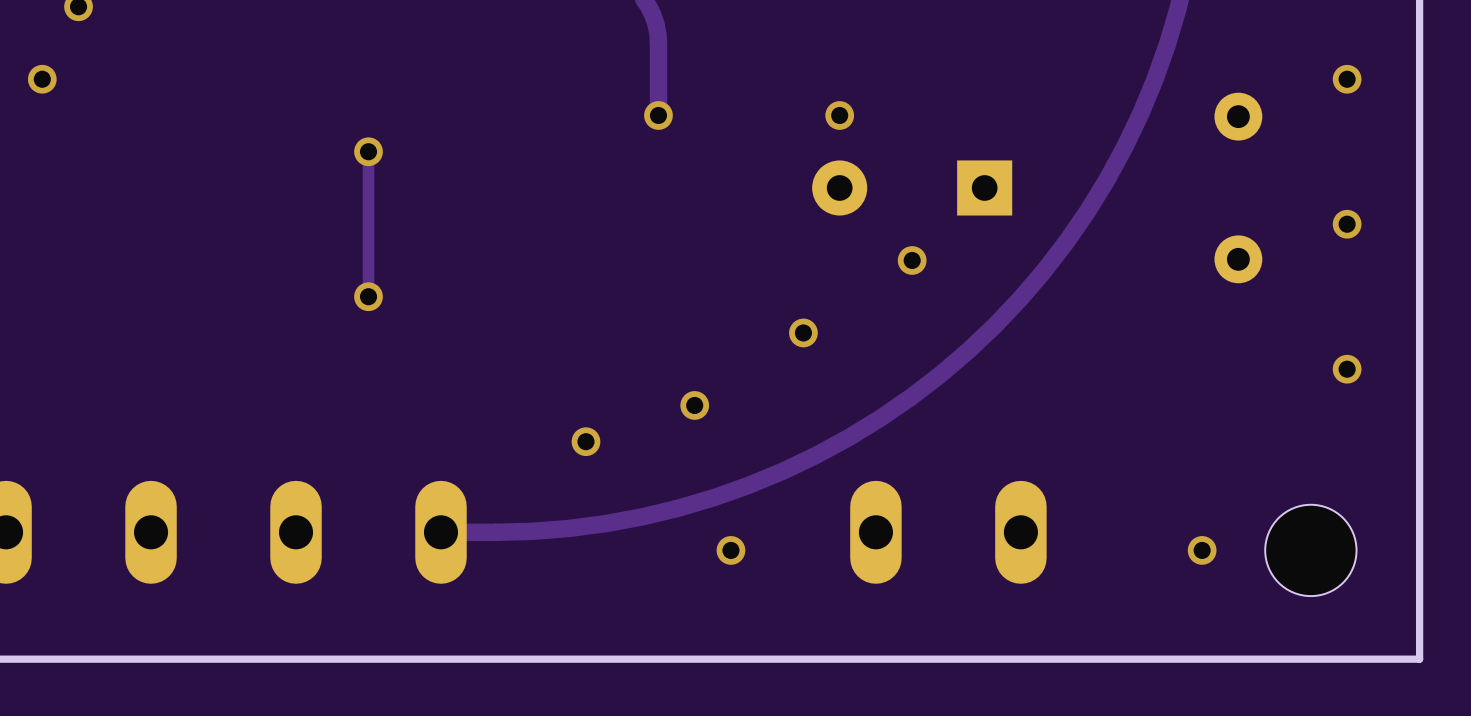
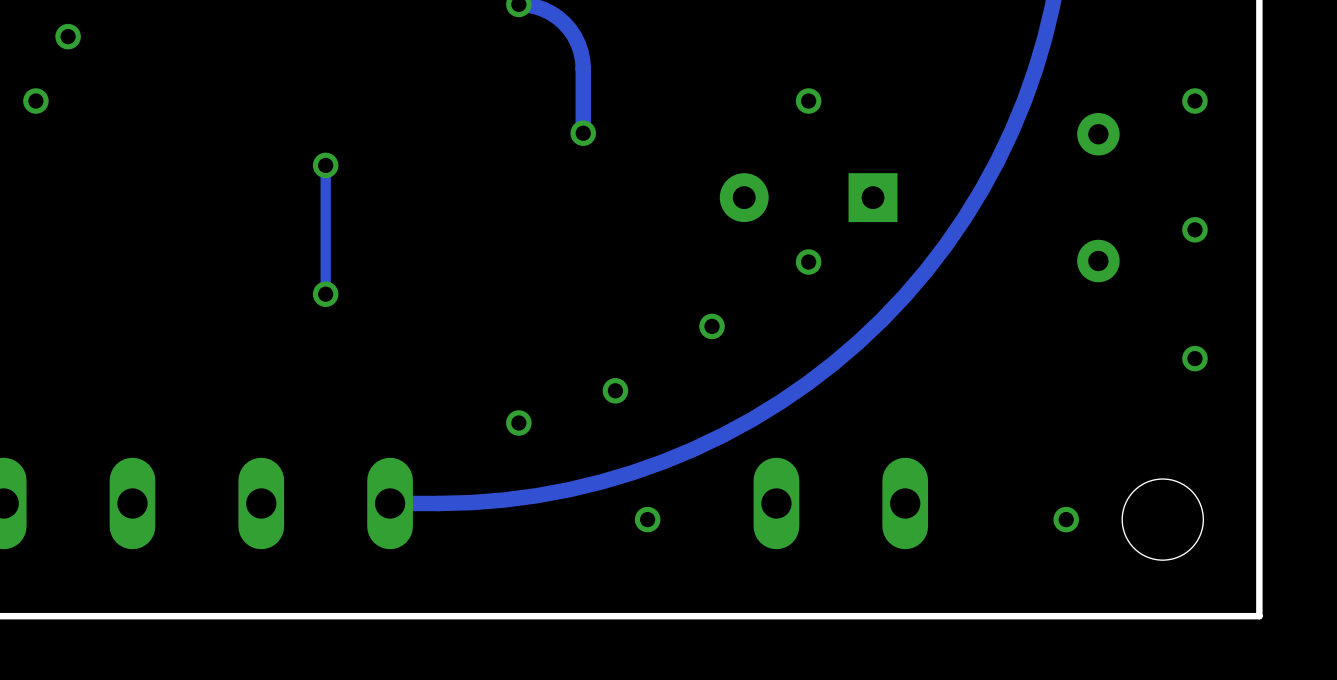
via position: (839, 115) -> (808, 101)

